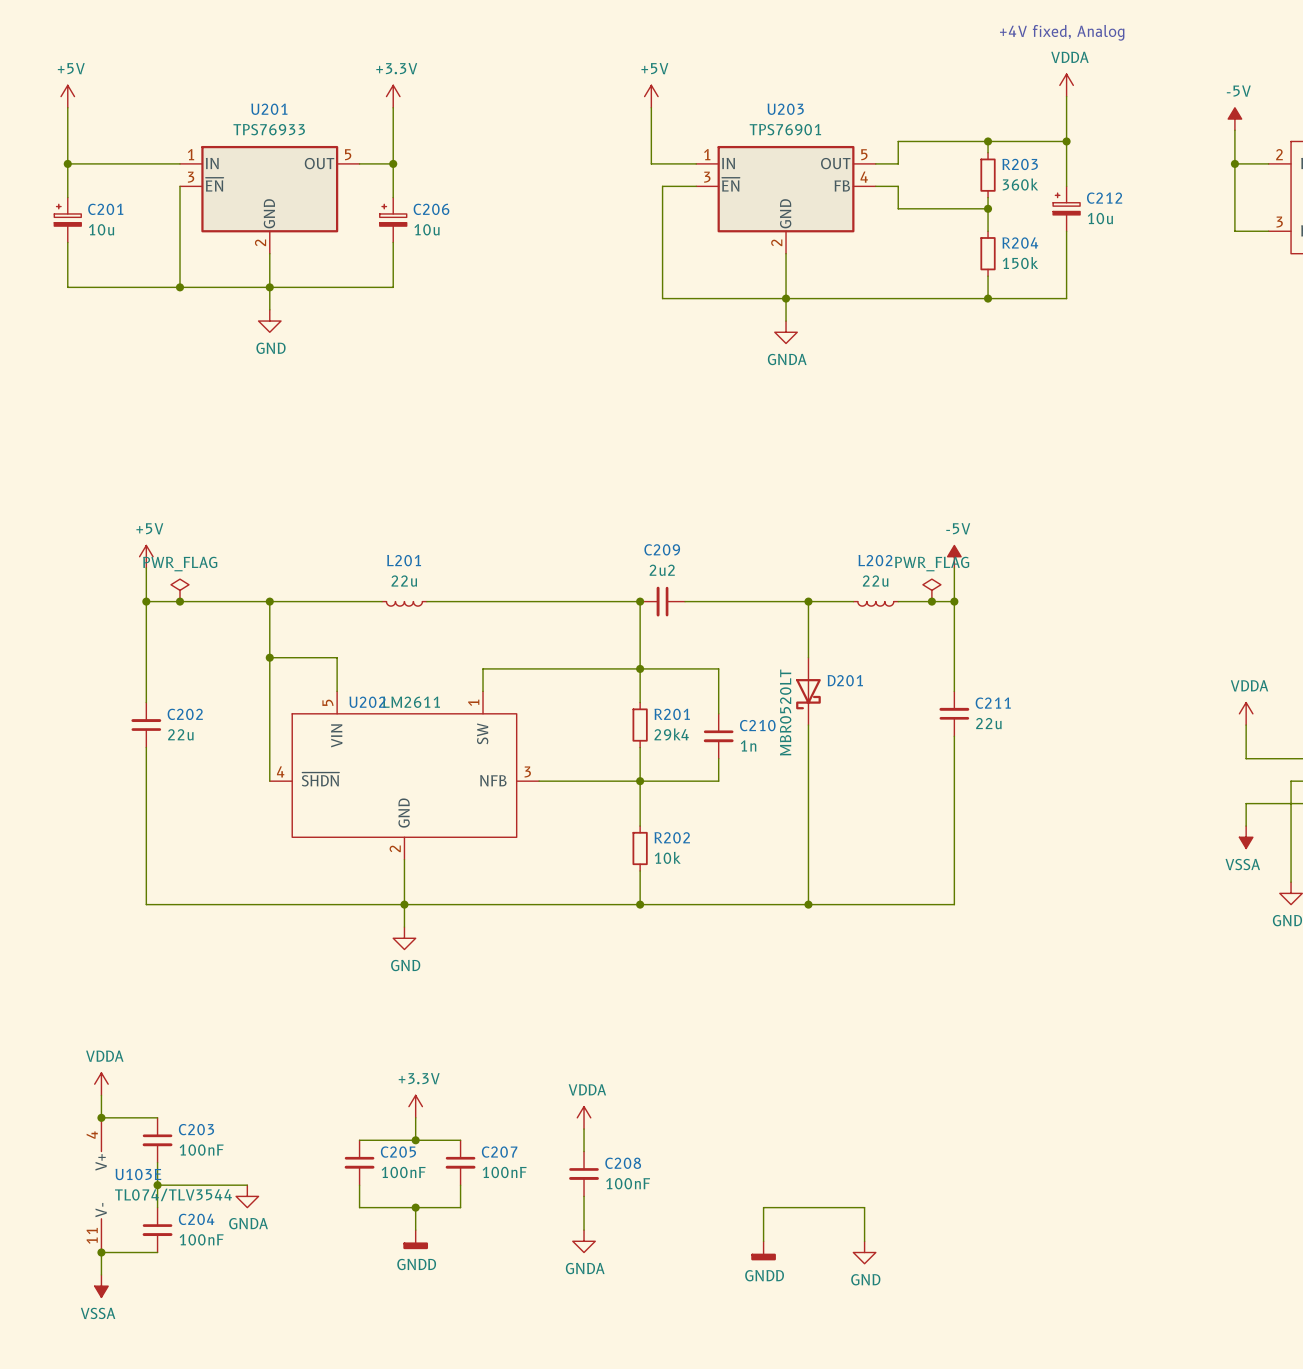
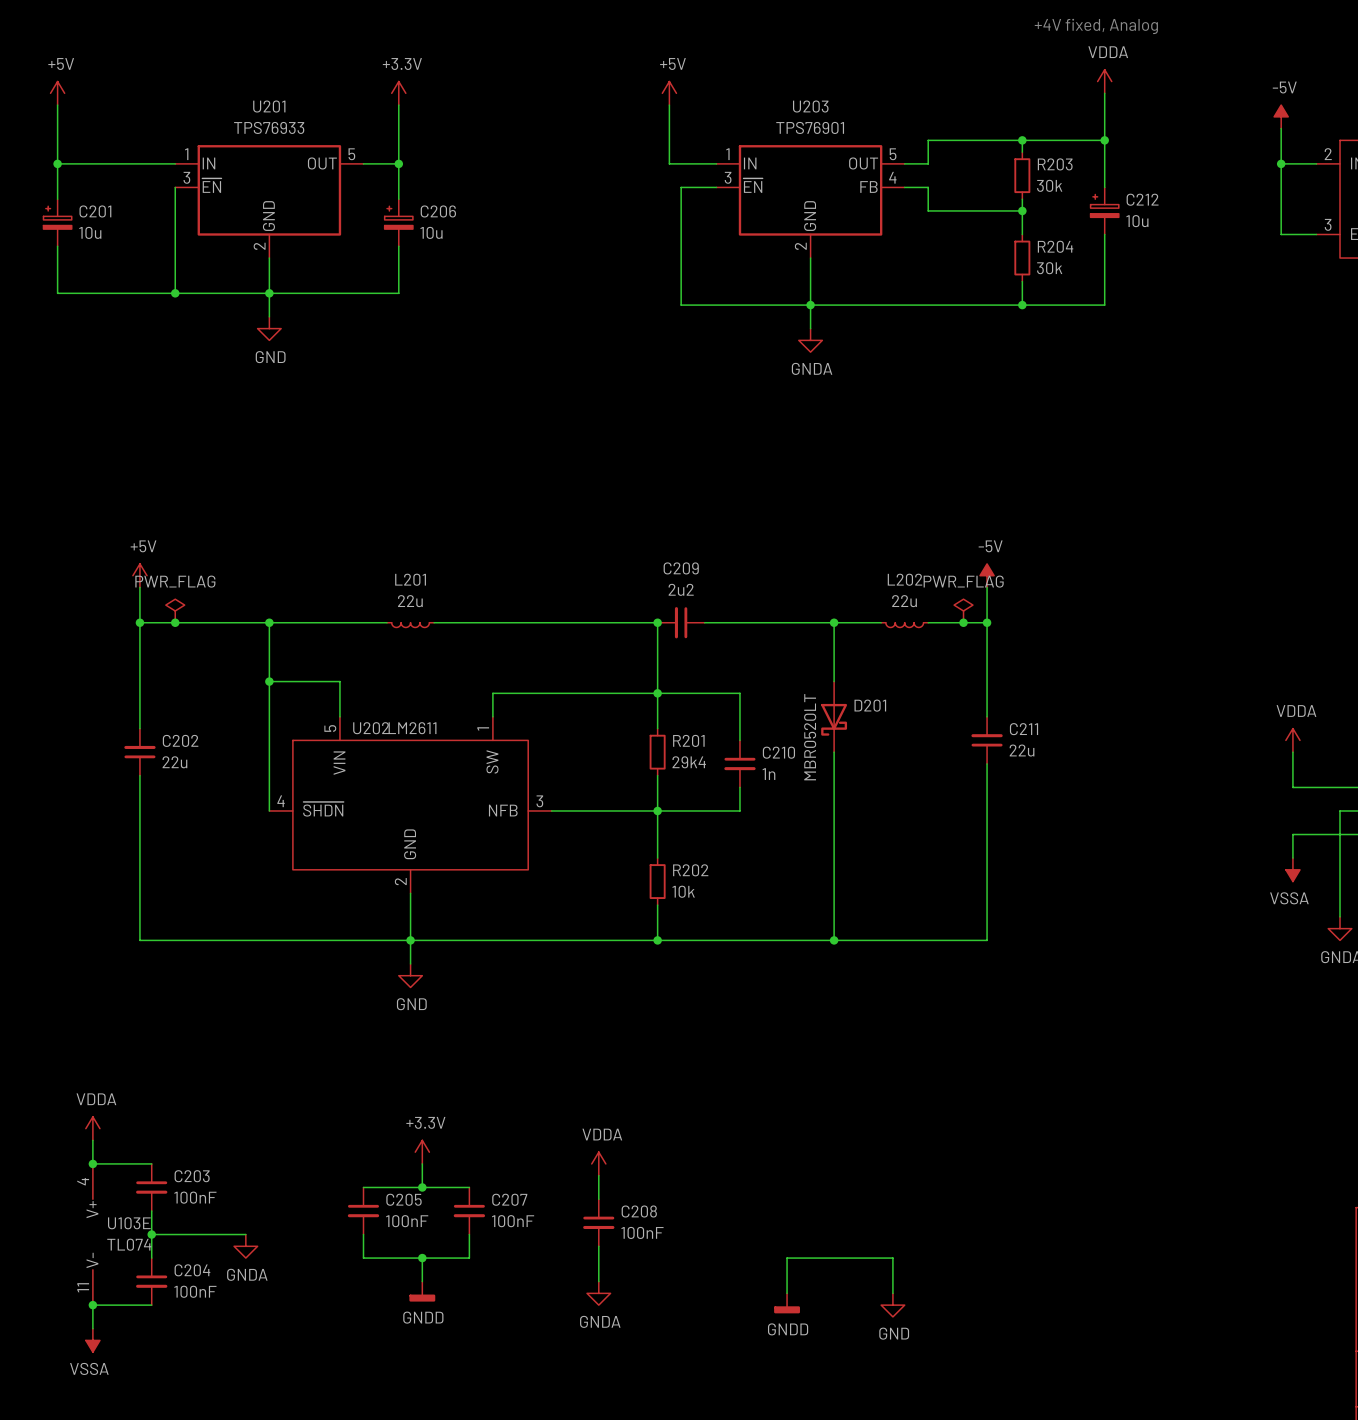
R203 value: 360k (1020, 184) -> 30k (1049, 185)
R204 value: 150k (1020, 263) -> 30k (1049, 268)
U103E value: TL074/TLV3544 (173, 1194) -> TL074 (129, 1244)

